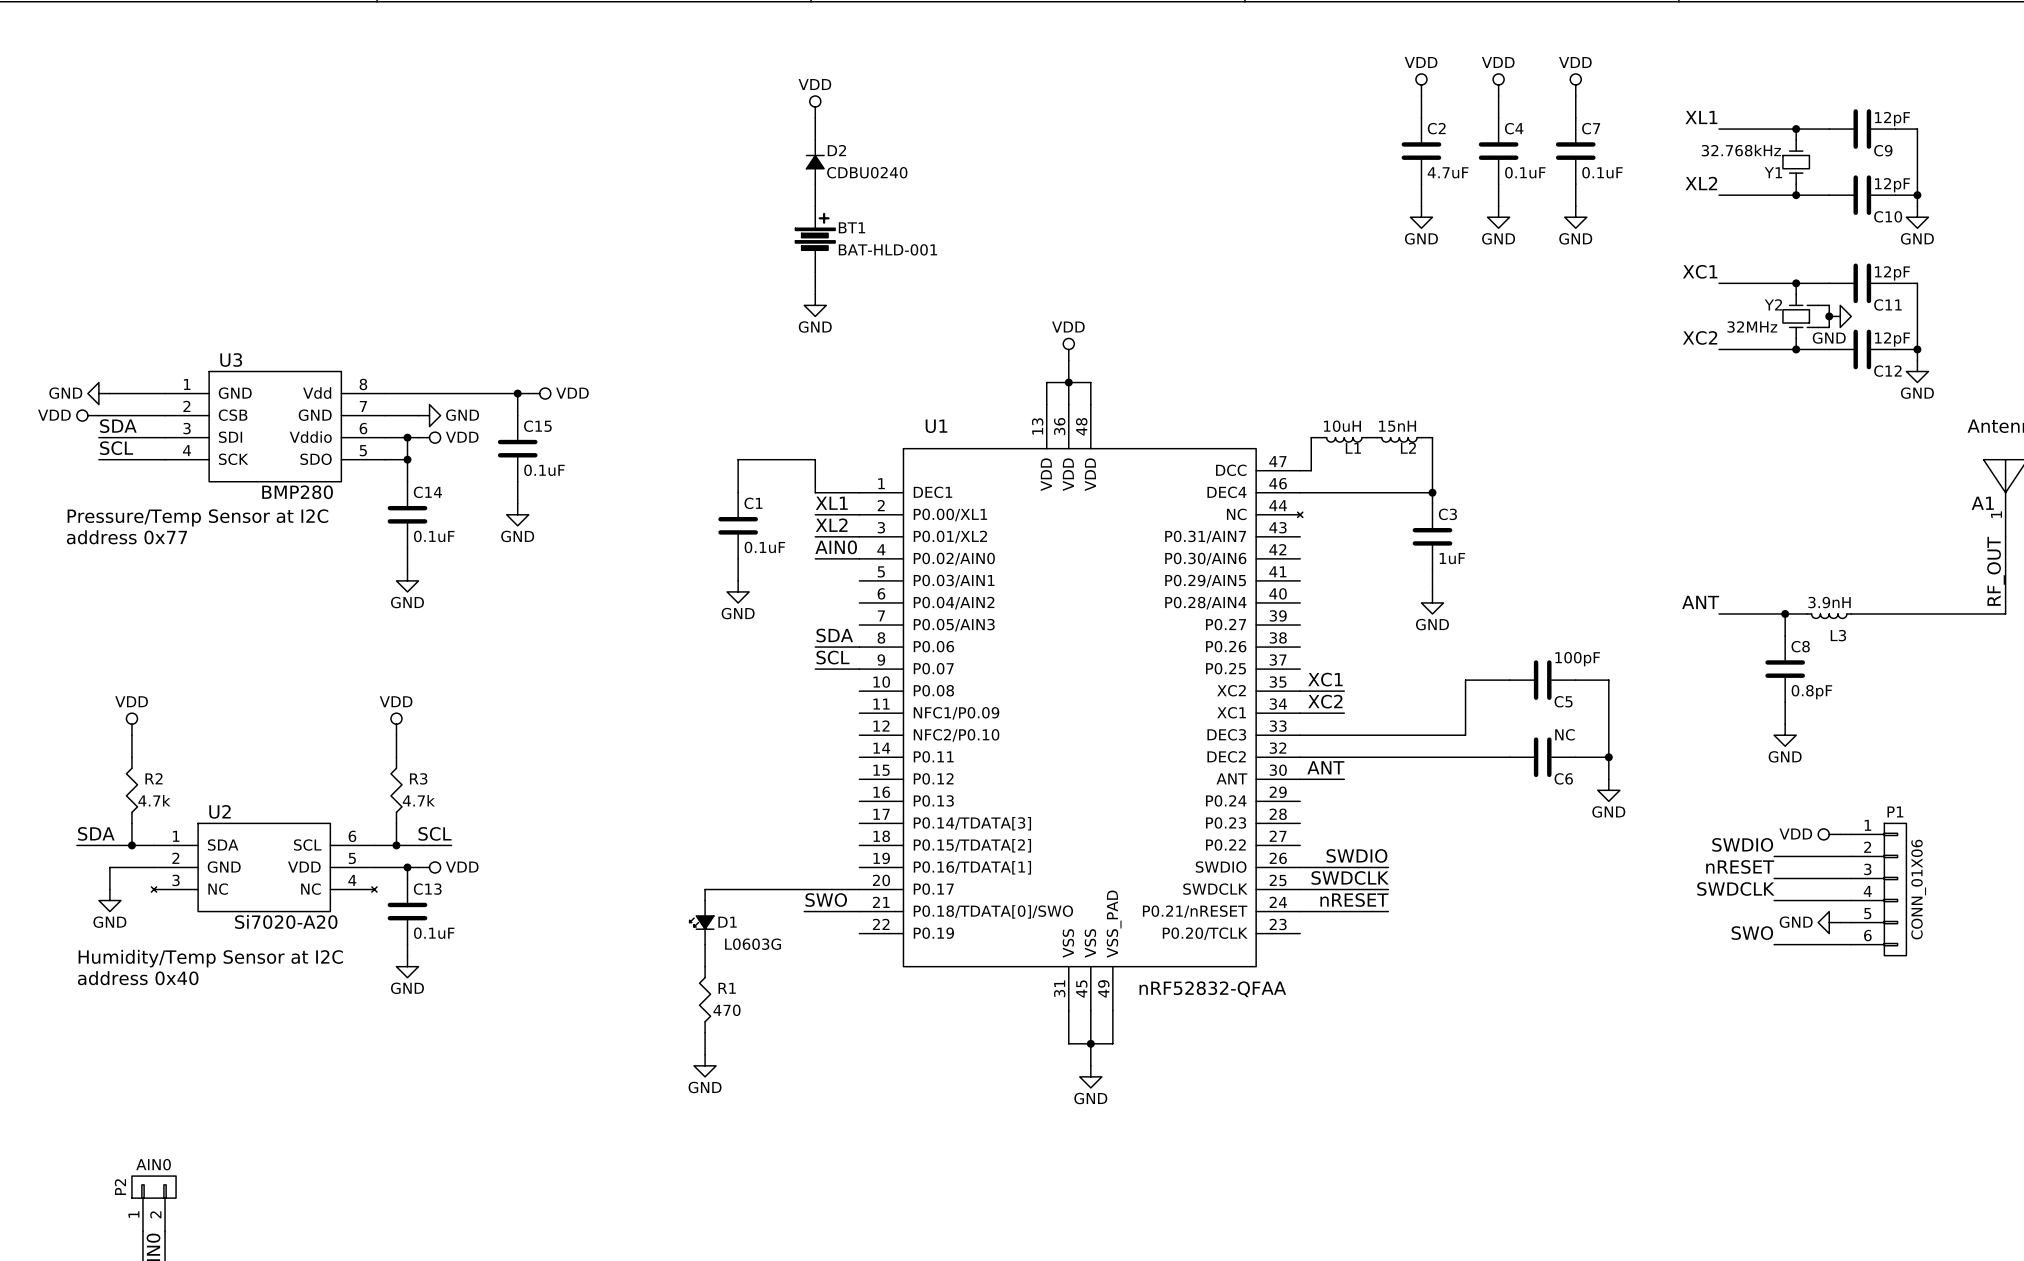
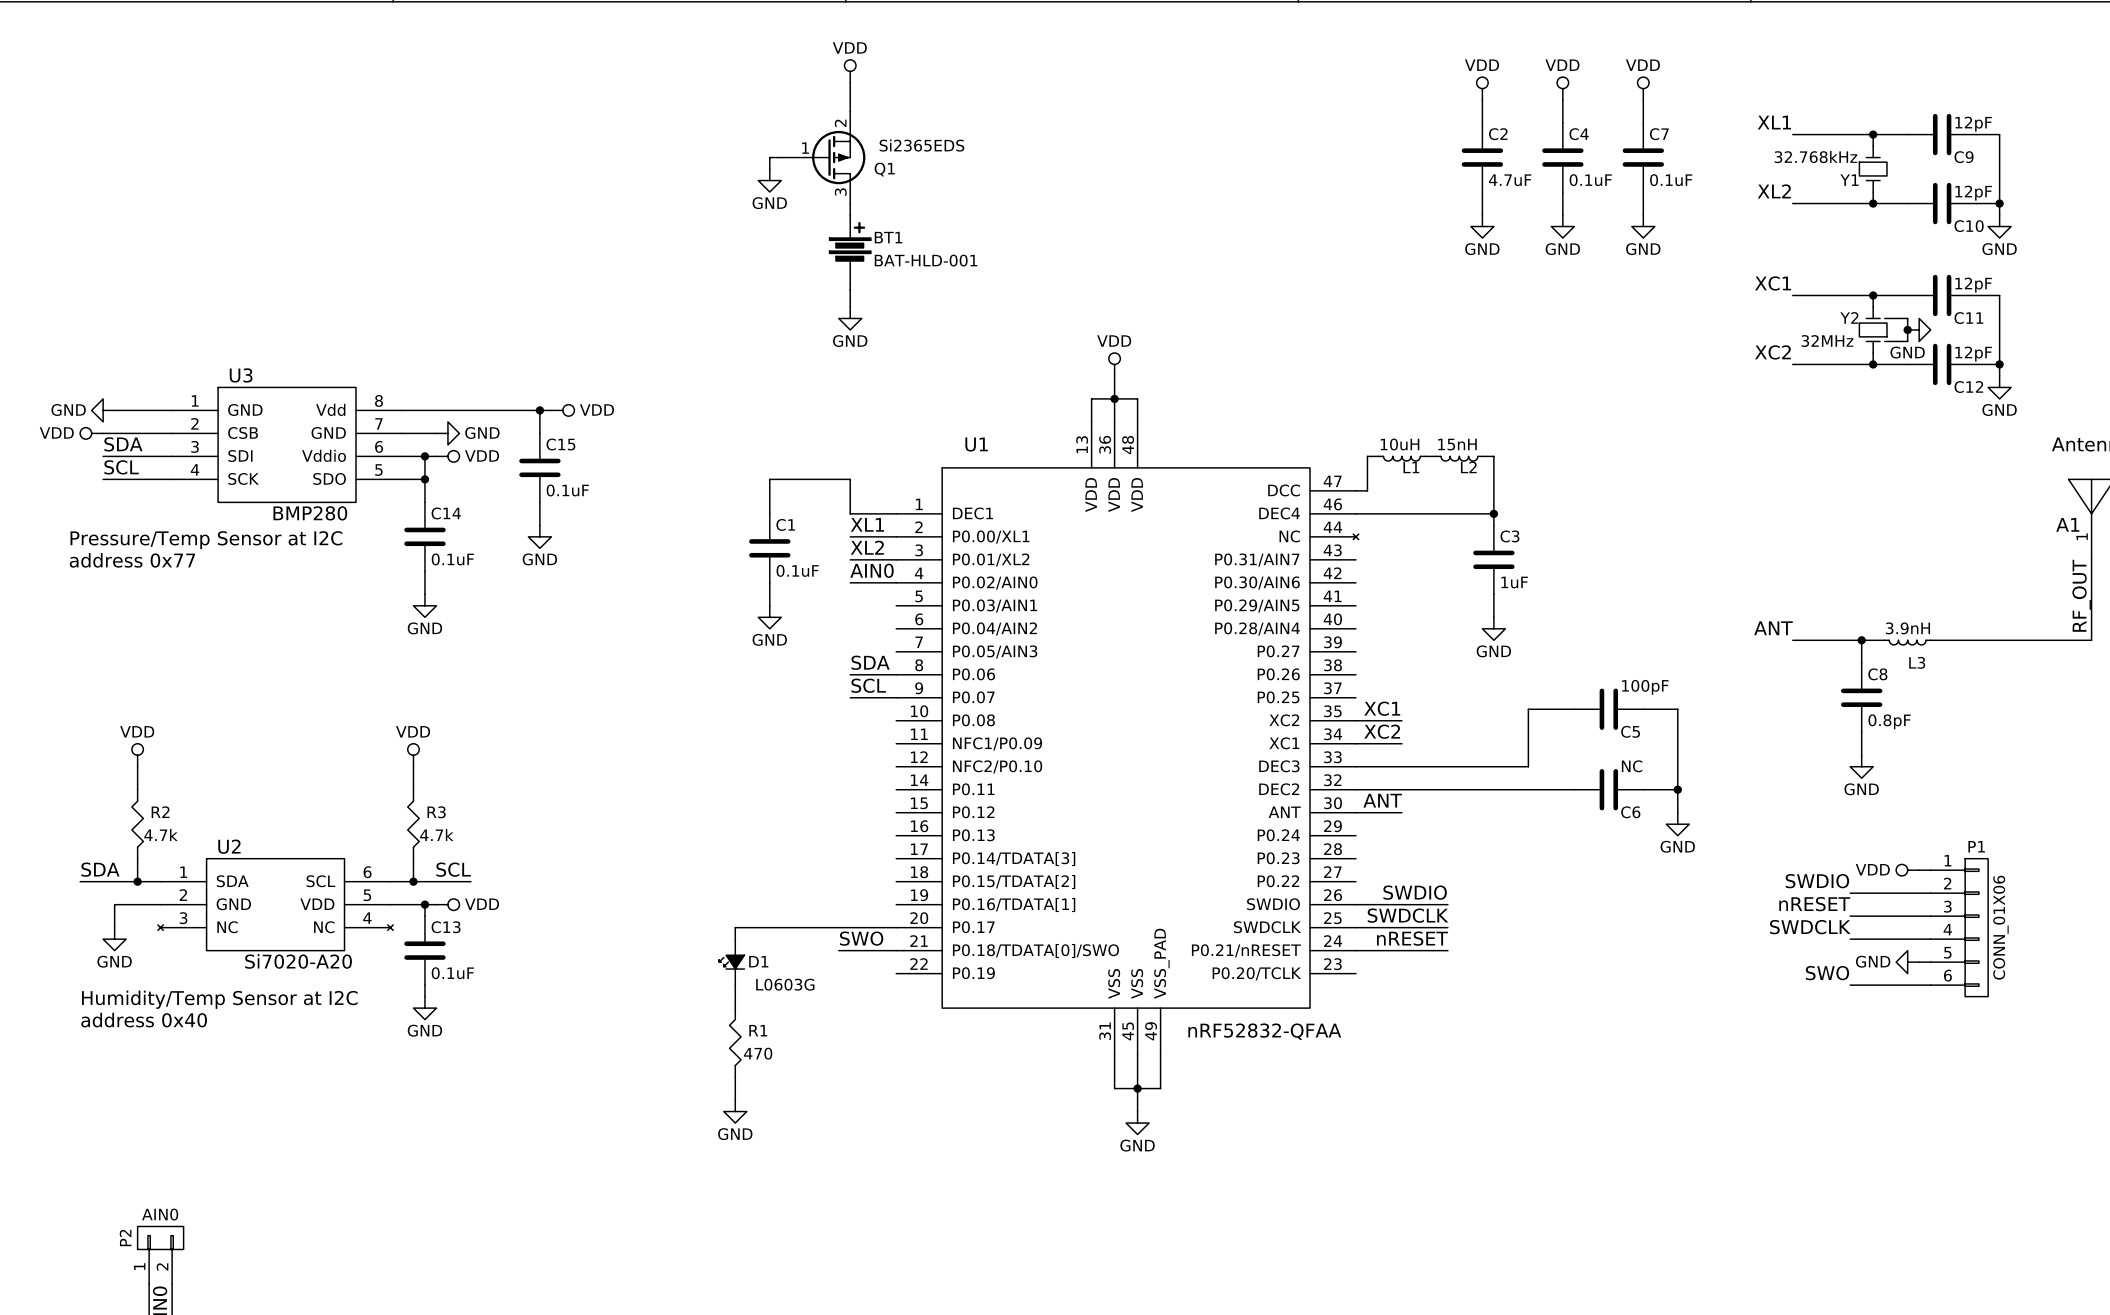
wire: none -> (850, 82) (850, 111)
power symbol position: VDD (815, 107) -> VDD (850, 71)
wire: none -> (781, 157) (769, 157) (769, 169)
Q1: none -> Si2365EDS (823, 157)
D2: CDBU0240 (815, 162) -> none
power symbol: none -> GND (769, 180)

